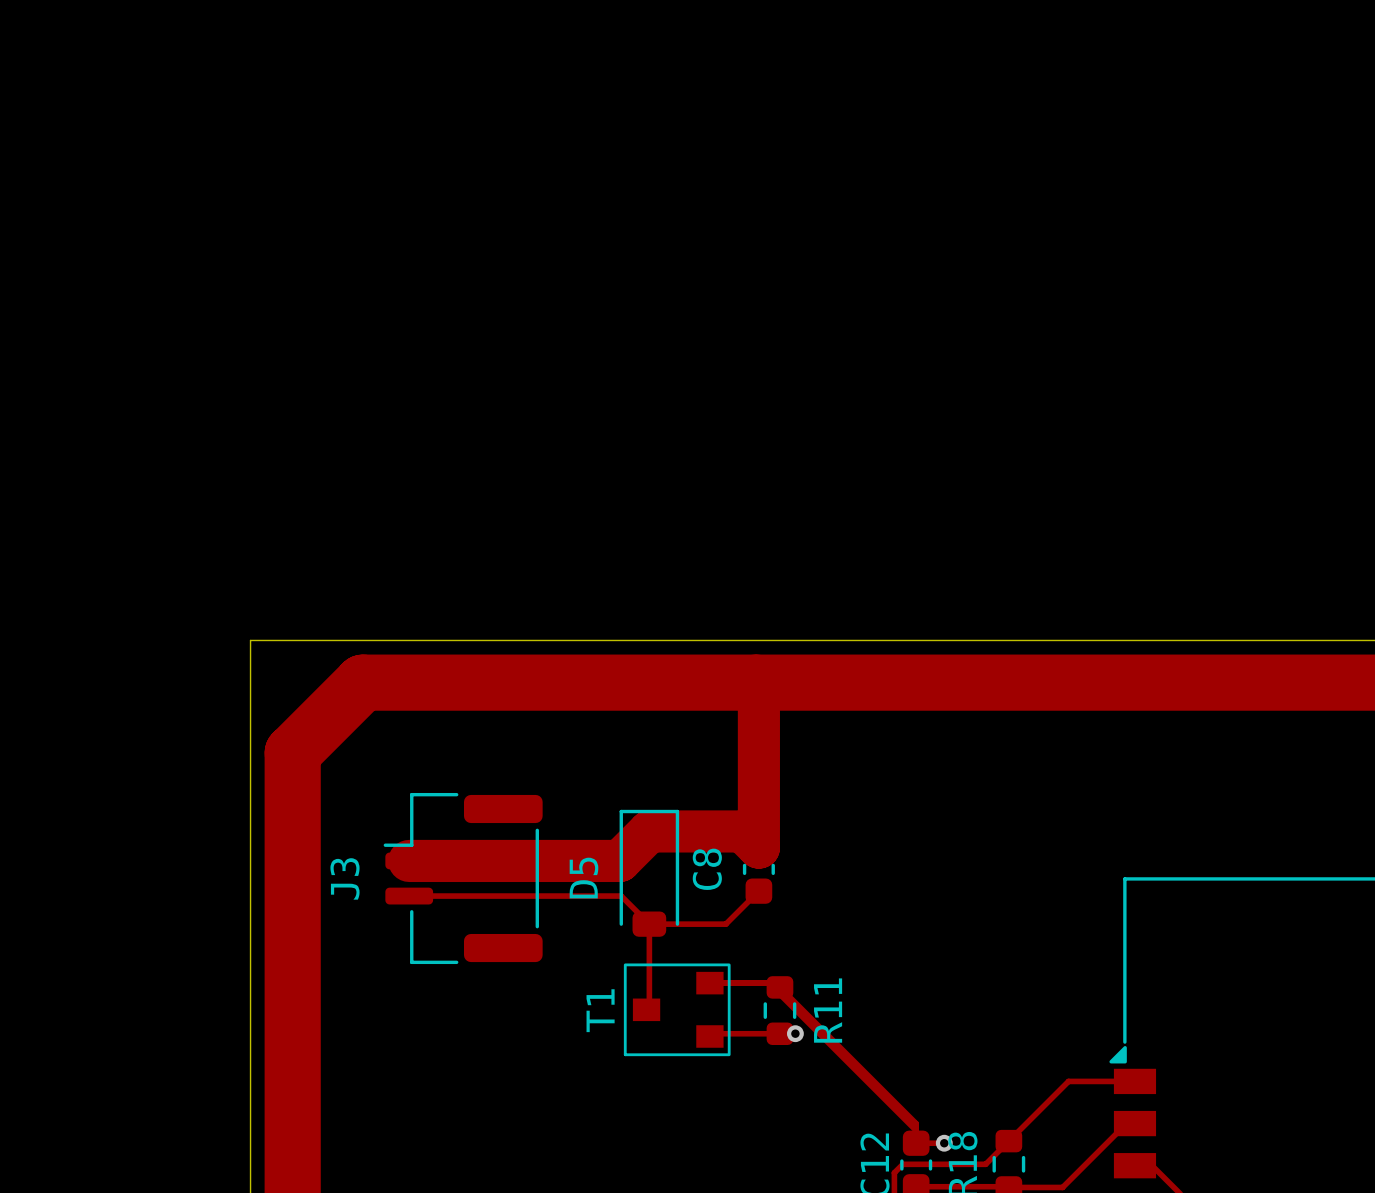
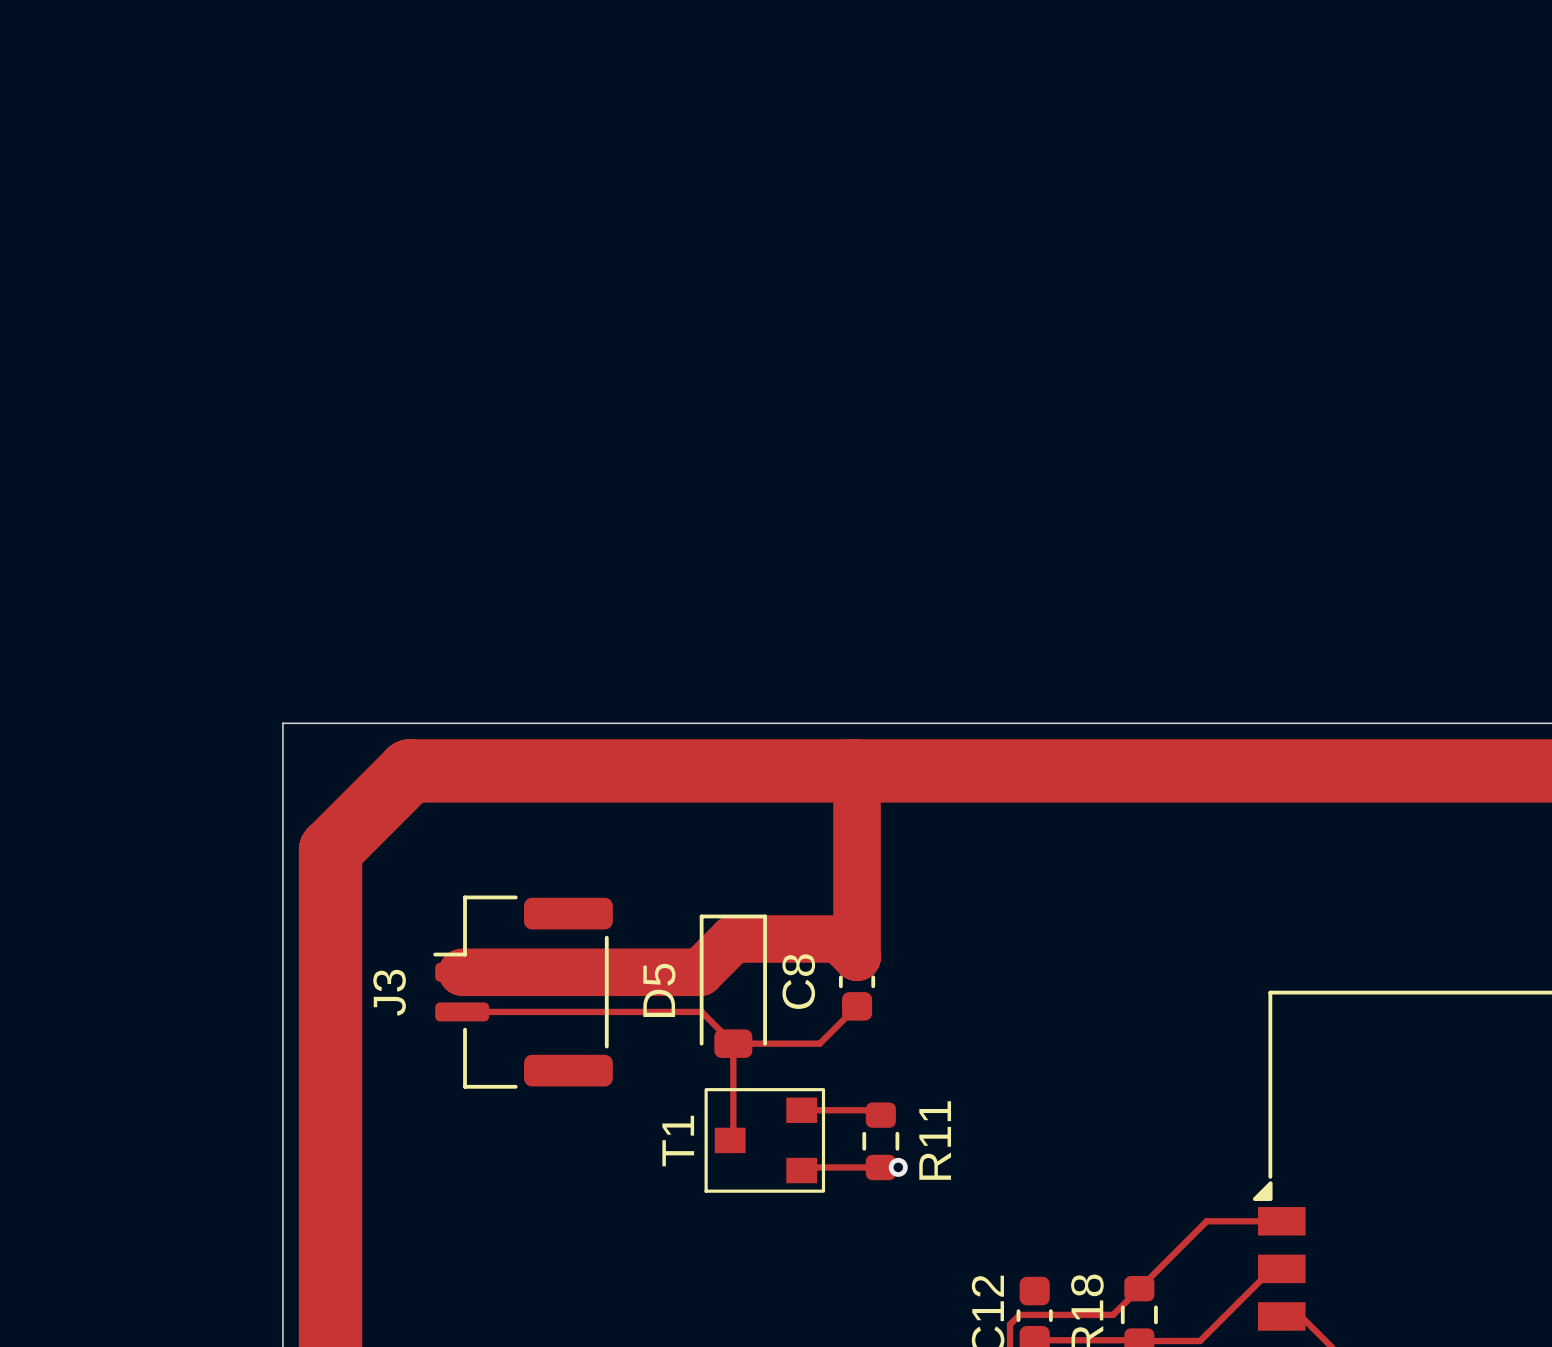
track: (768, 983) (916, 1130) -> none
track: (779, 987) (916, 1123) (916, 1143) (944, 1143) -> none
via: (944, 1143) -> none

